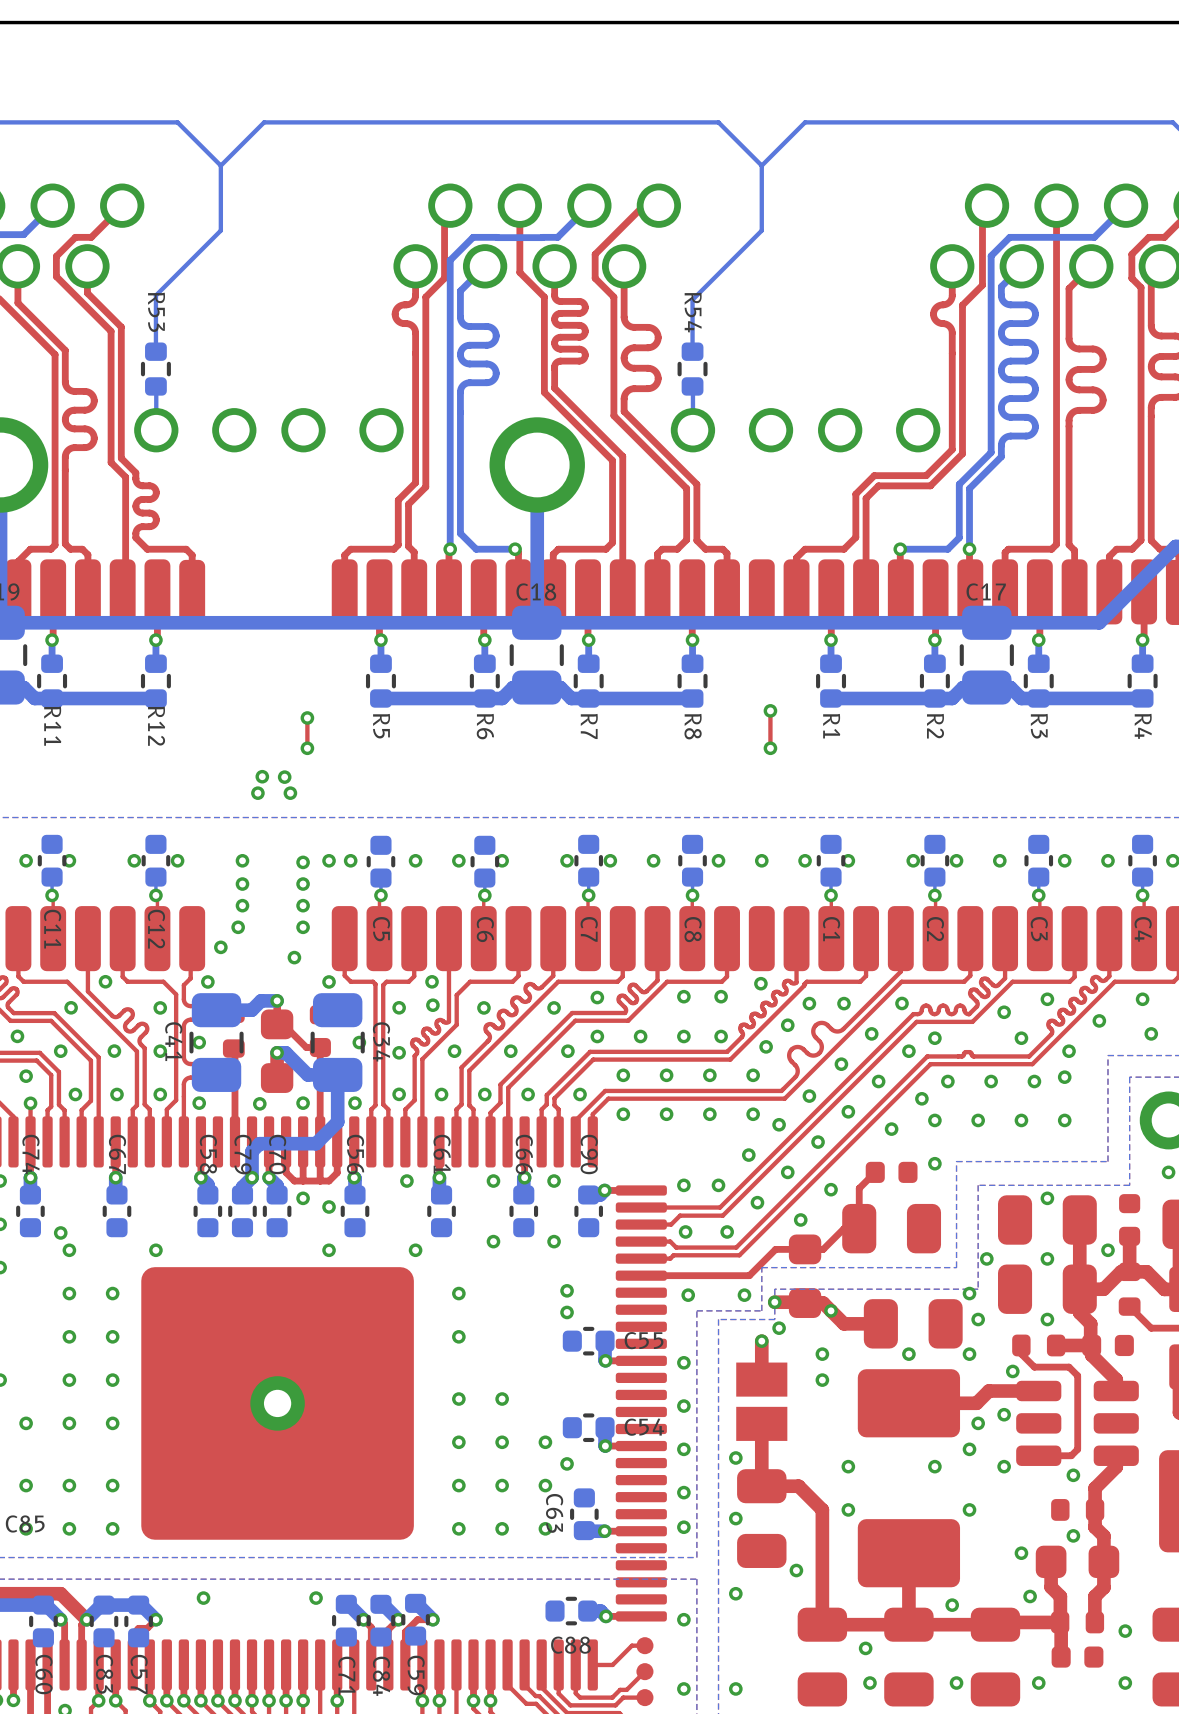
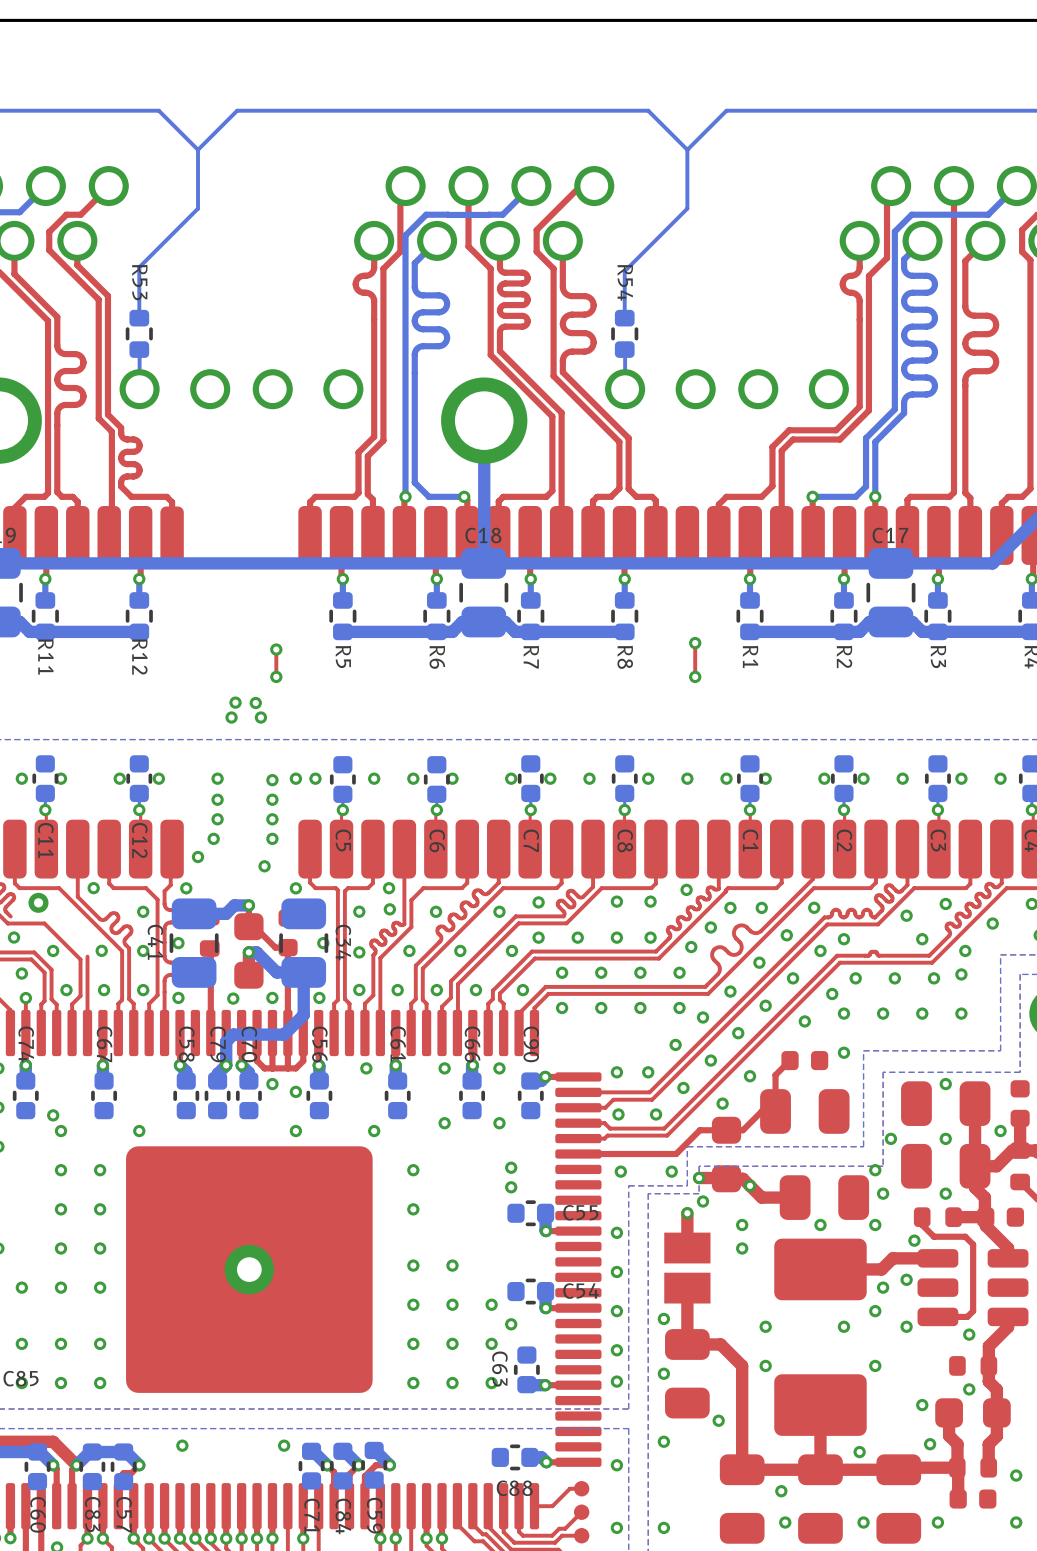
via: none -> (38, 902)
via: (71, 1007) -> none
top track: (13, 1013) (54, 1013) (98, 1057) -> none

